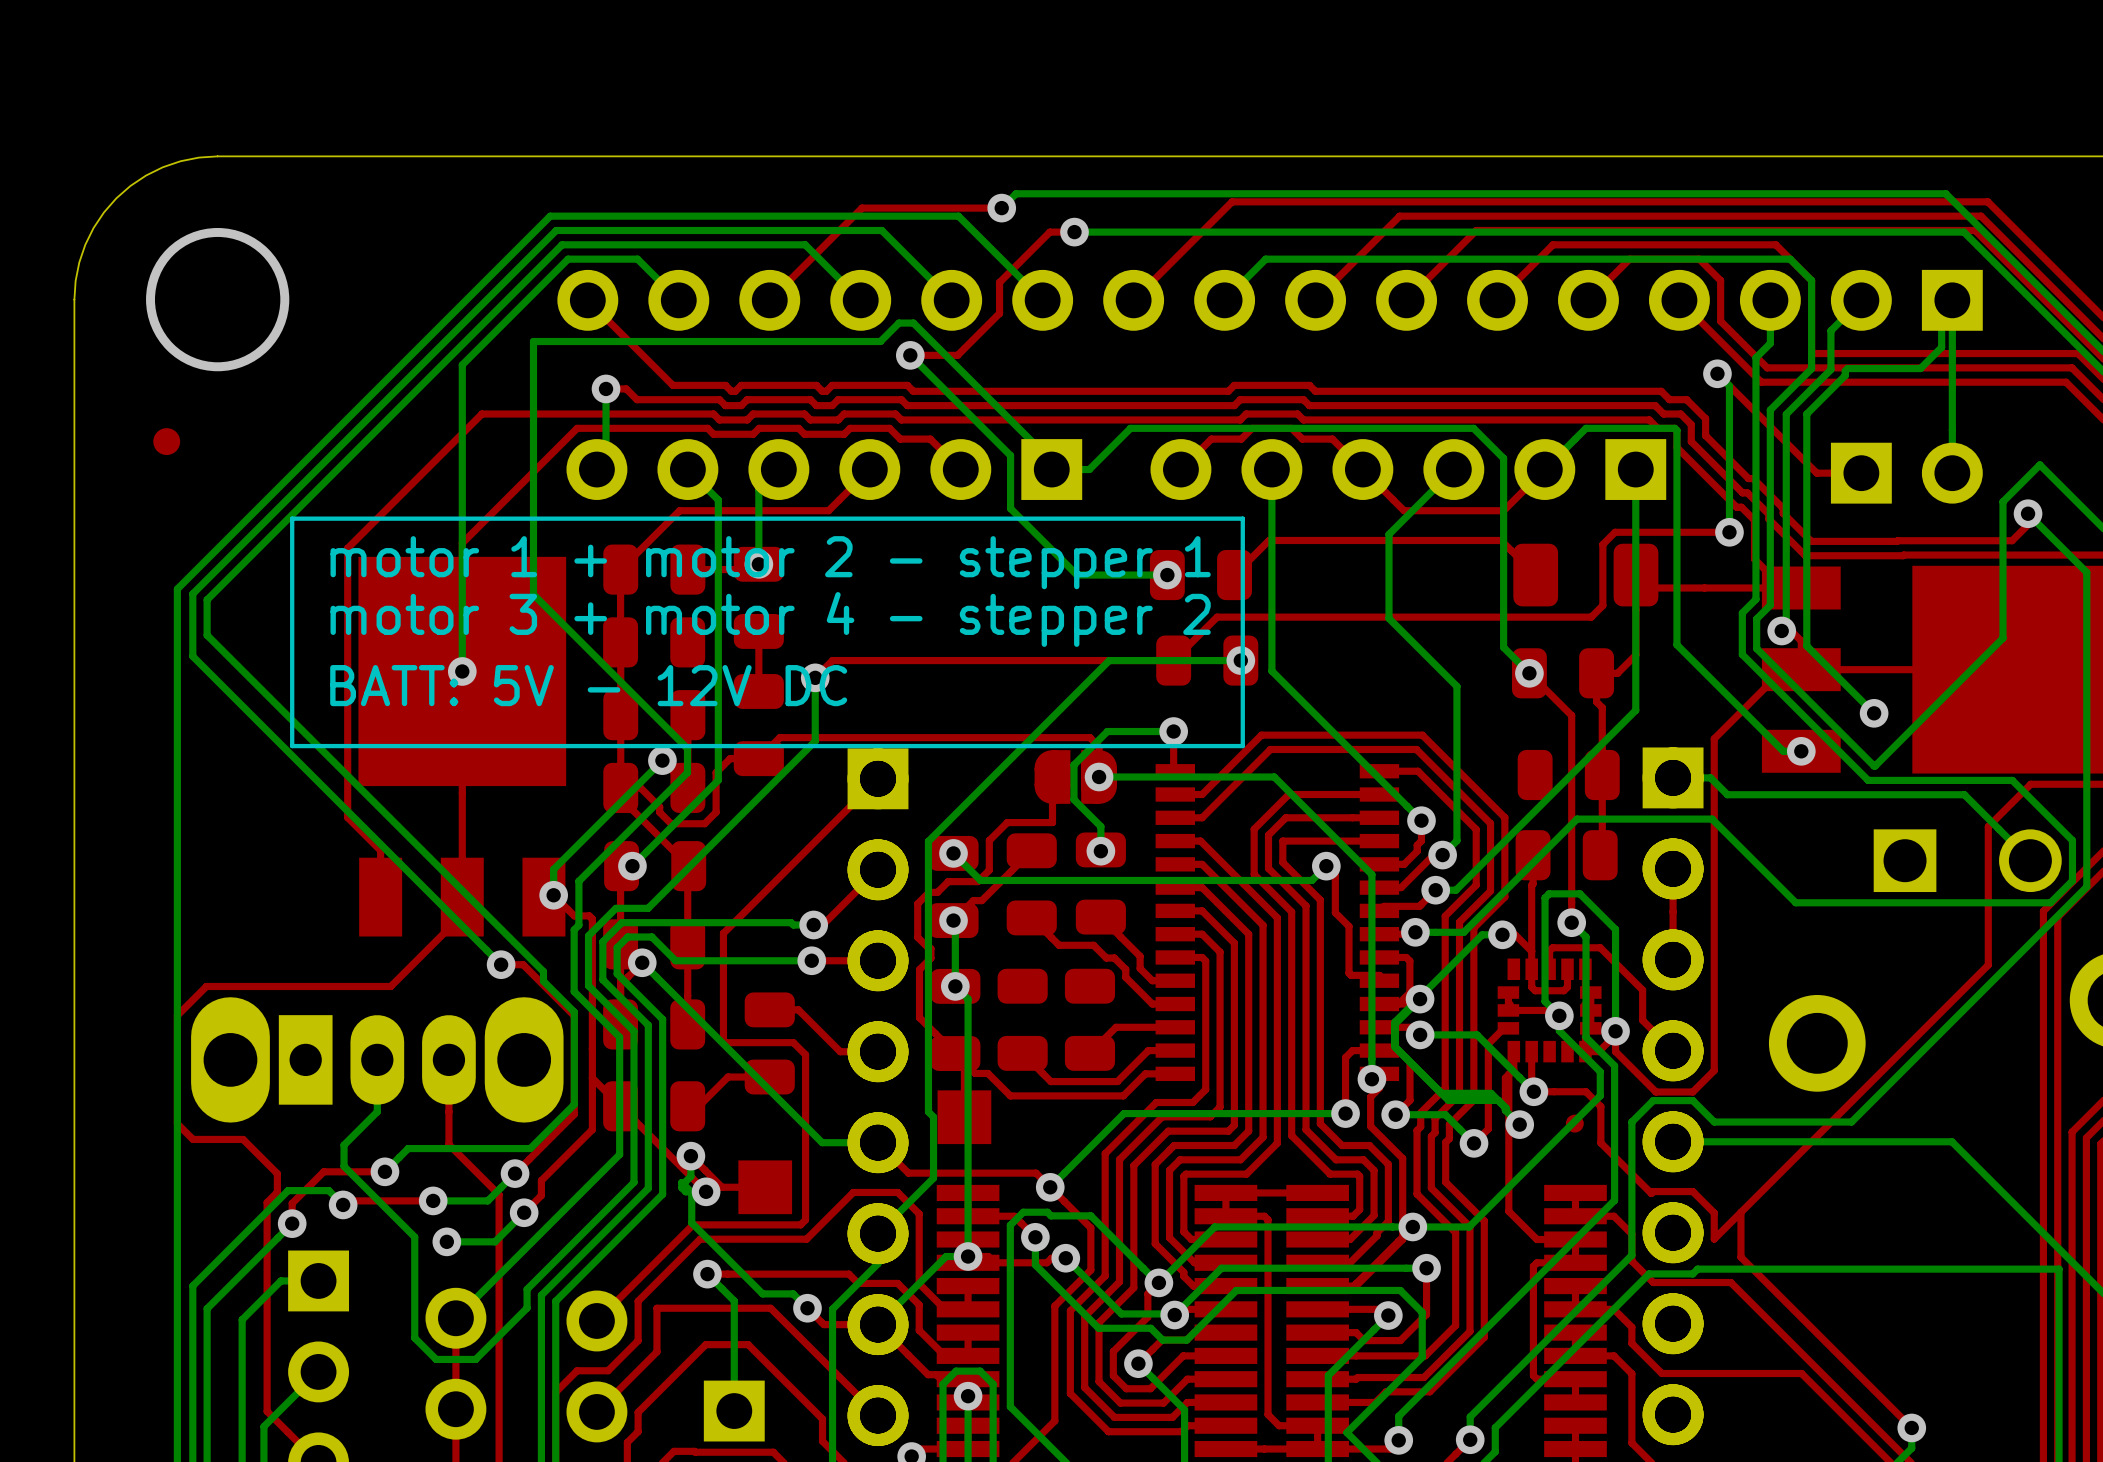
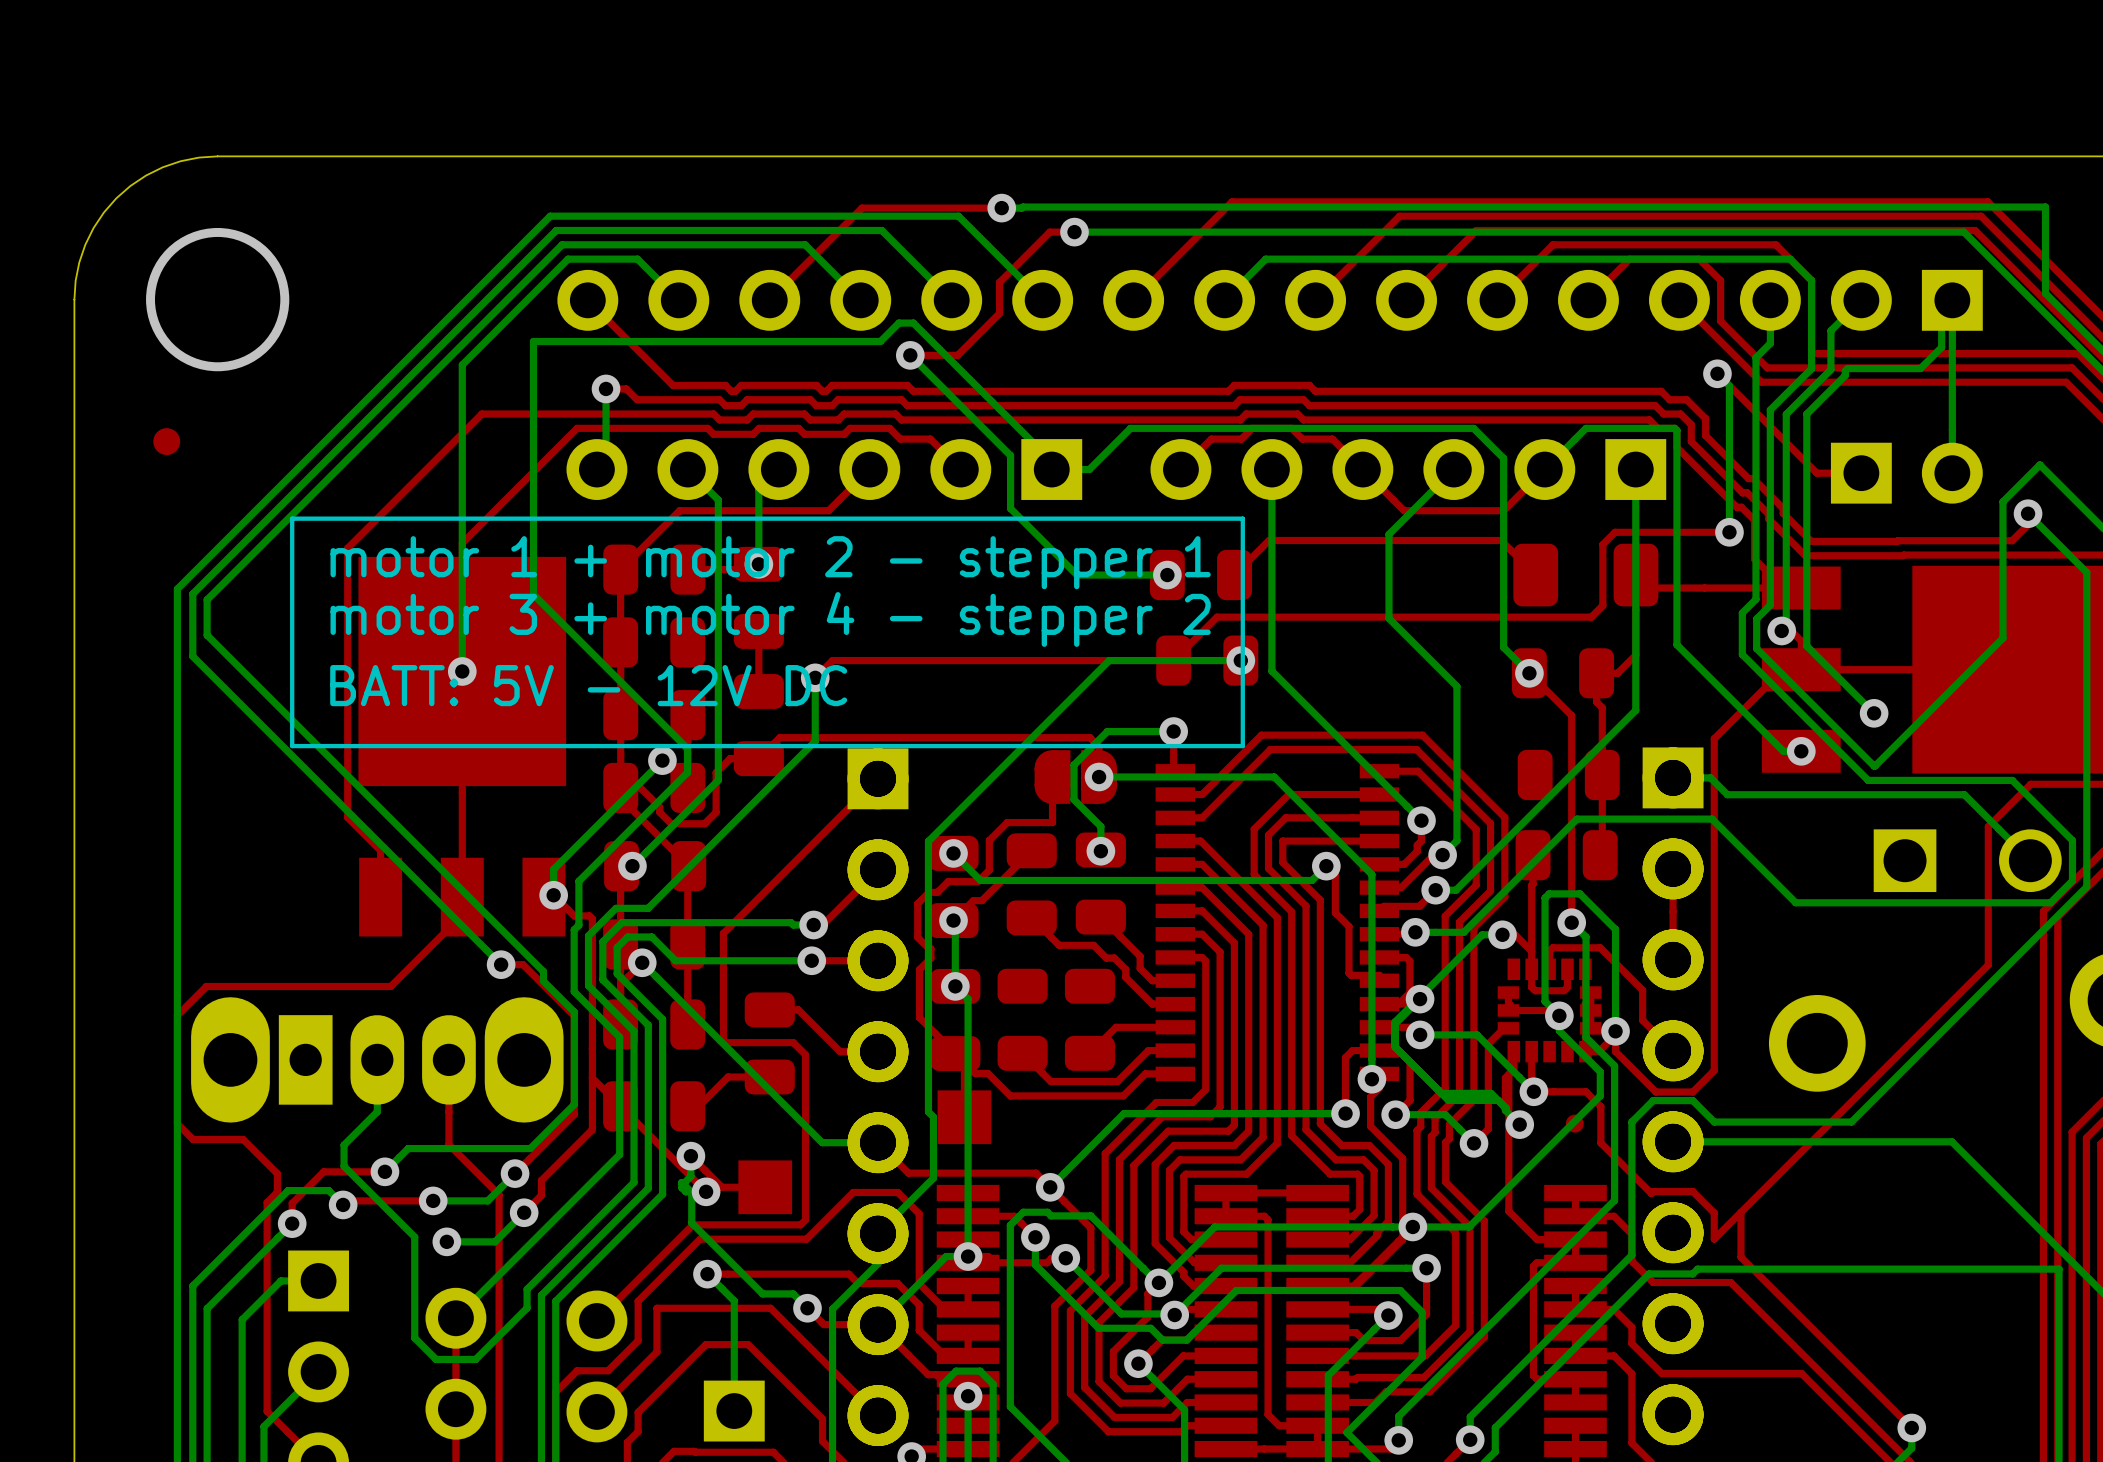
bottom track: (1001, 208) (1016, 193) (1945, 193) (2045, 293) -> (1001, 208) (2045, 207) (2045, 293)

